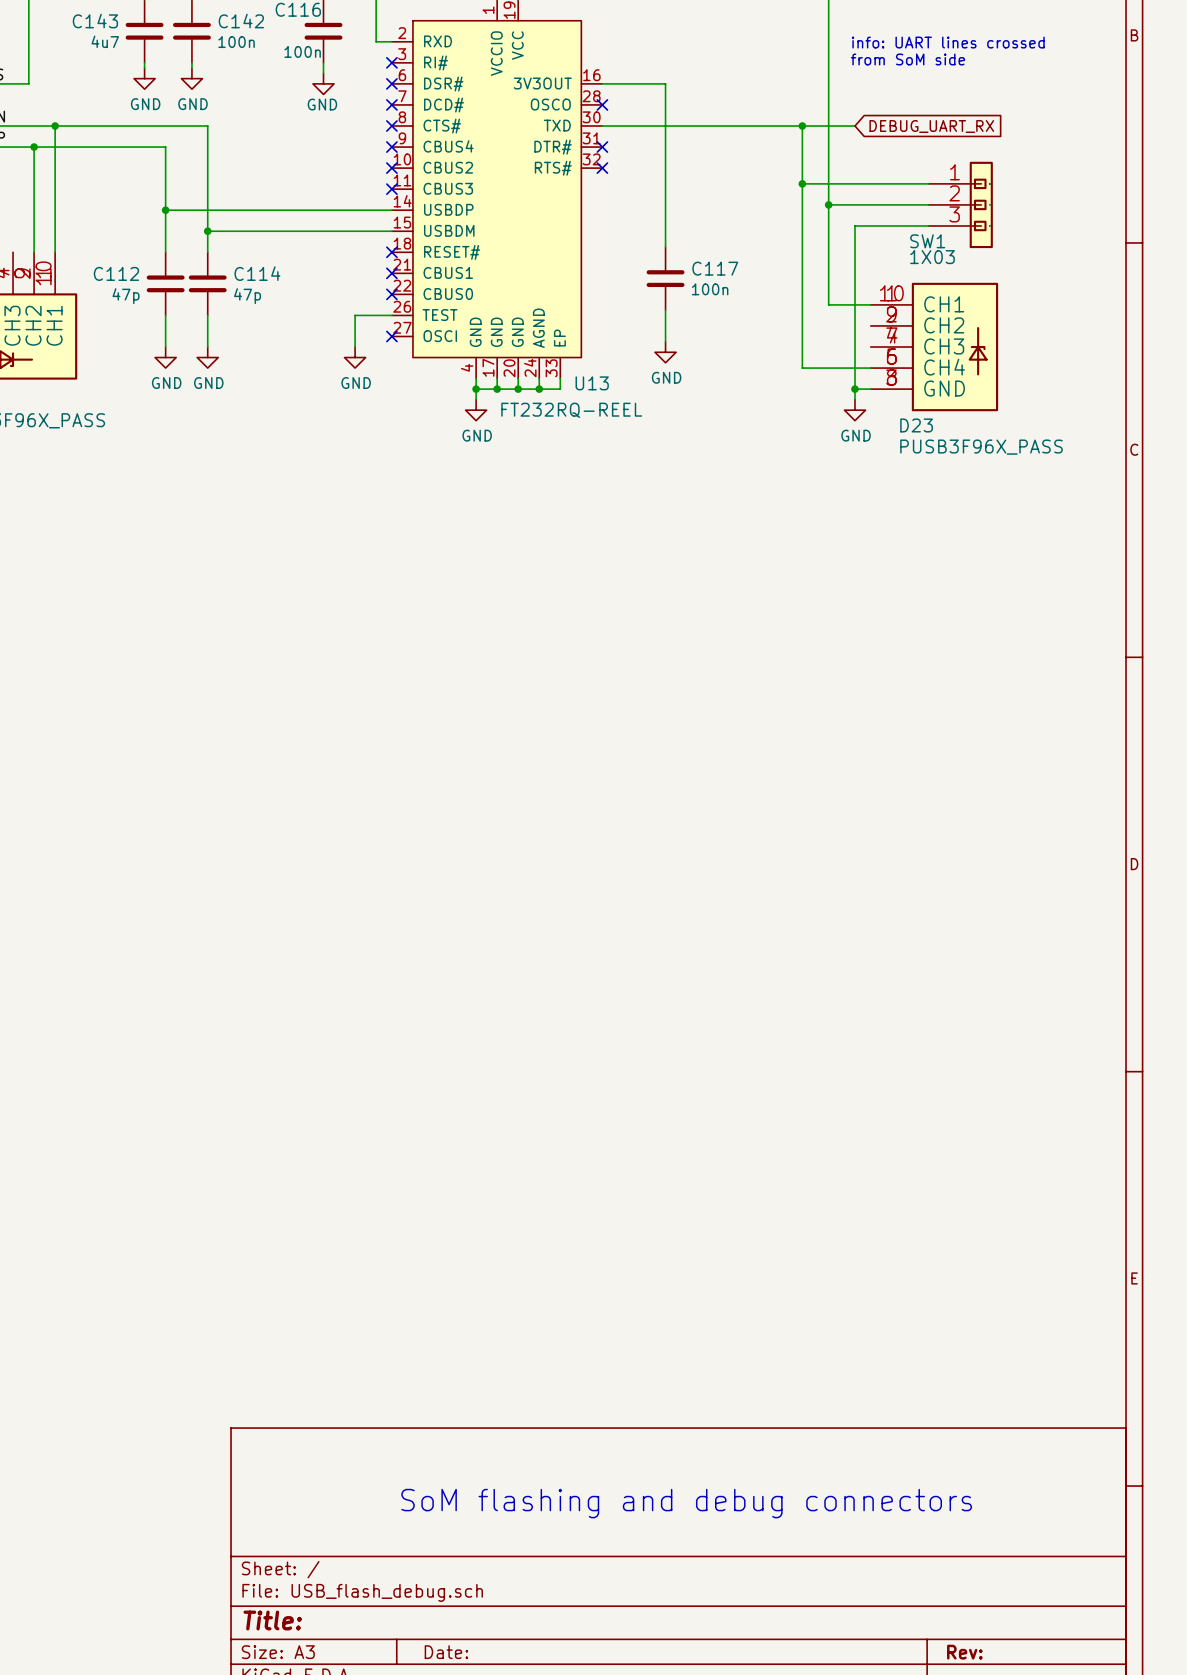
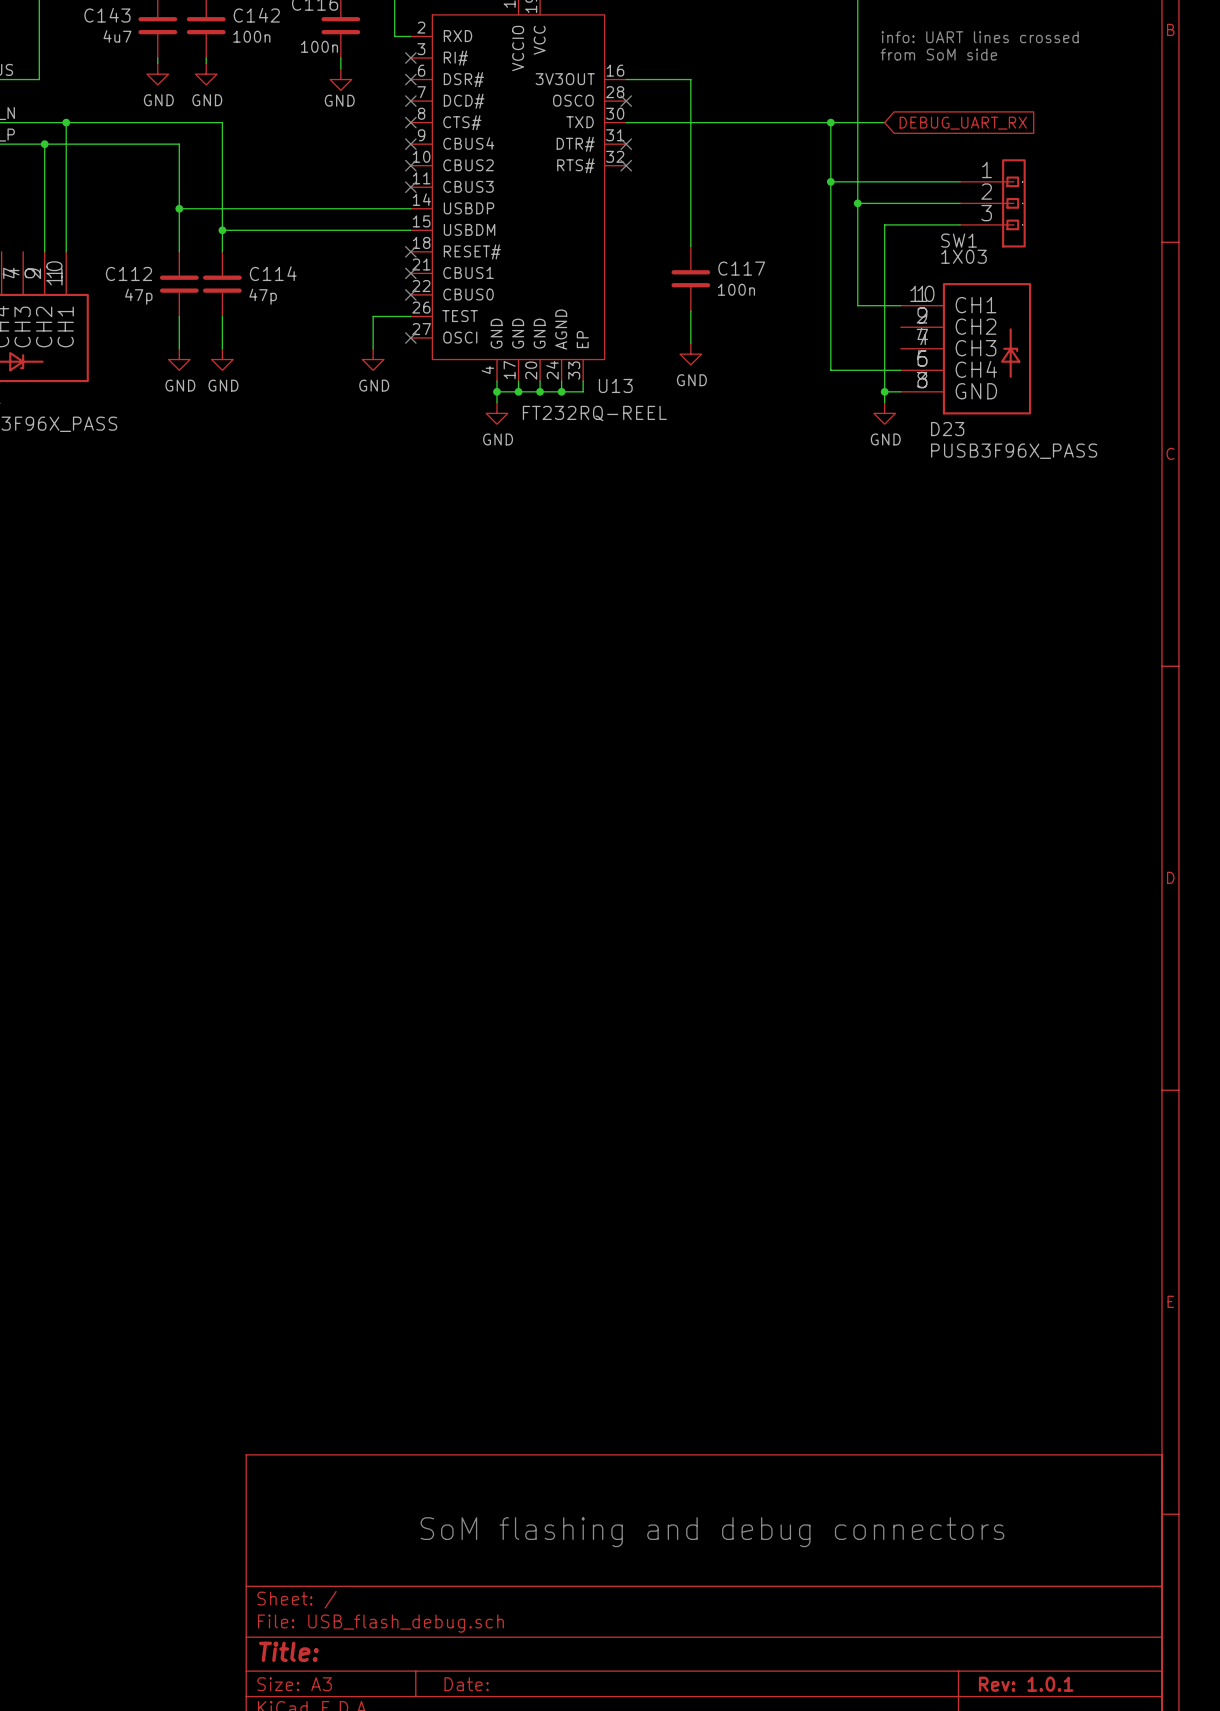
title block: Rev: (964, 1652) -> Rev: 1.0.1 (1026, 1684)

